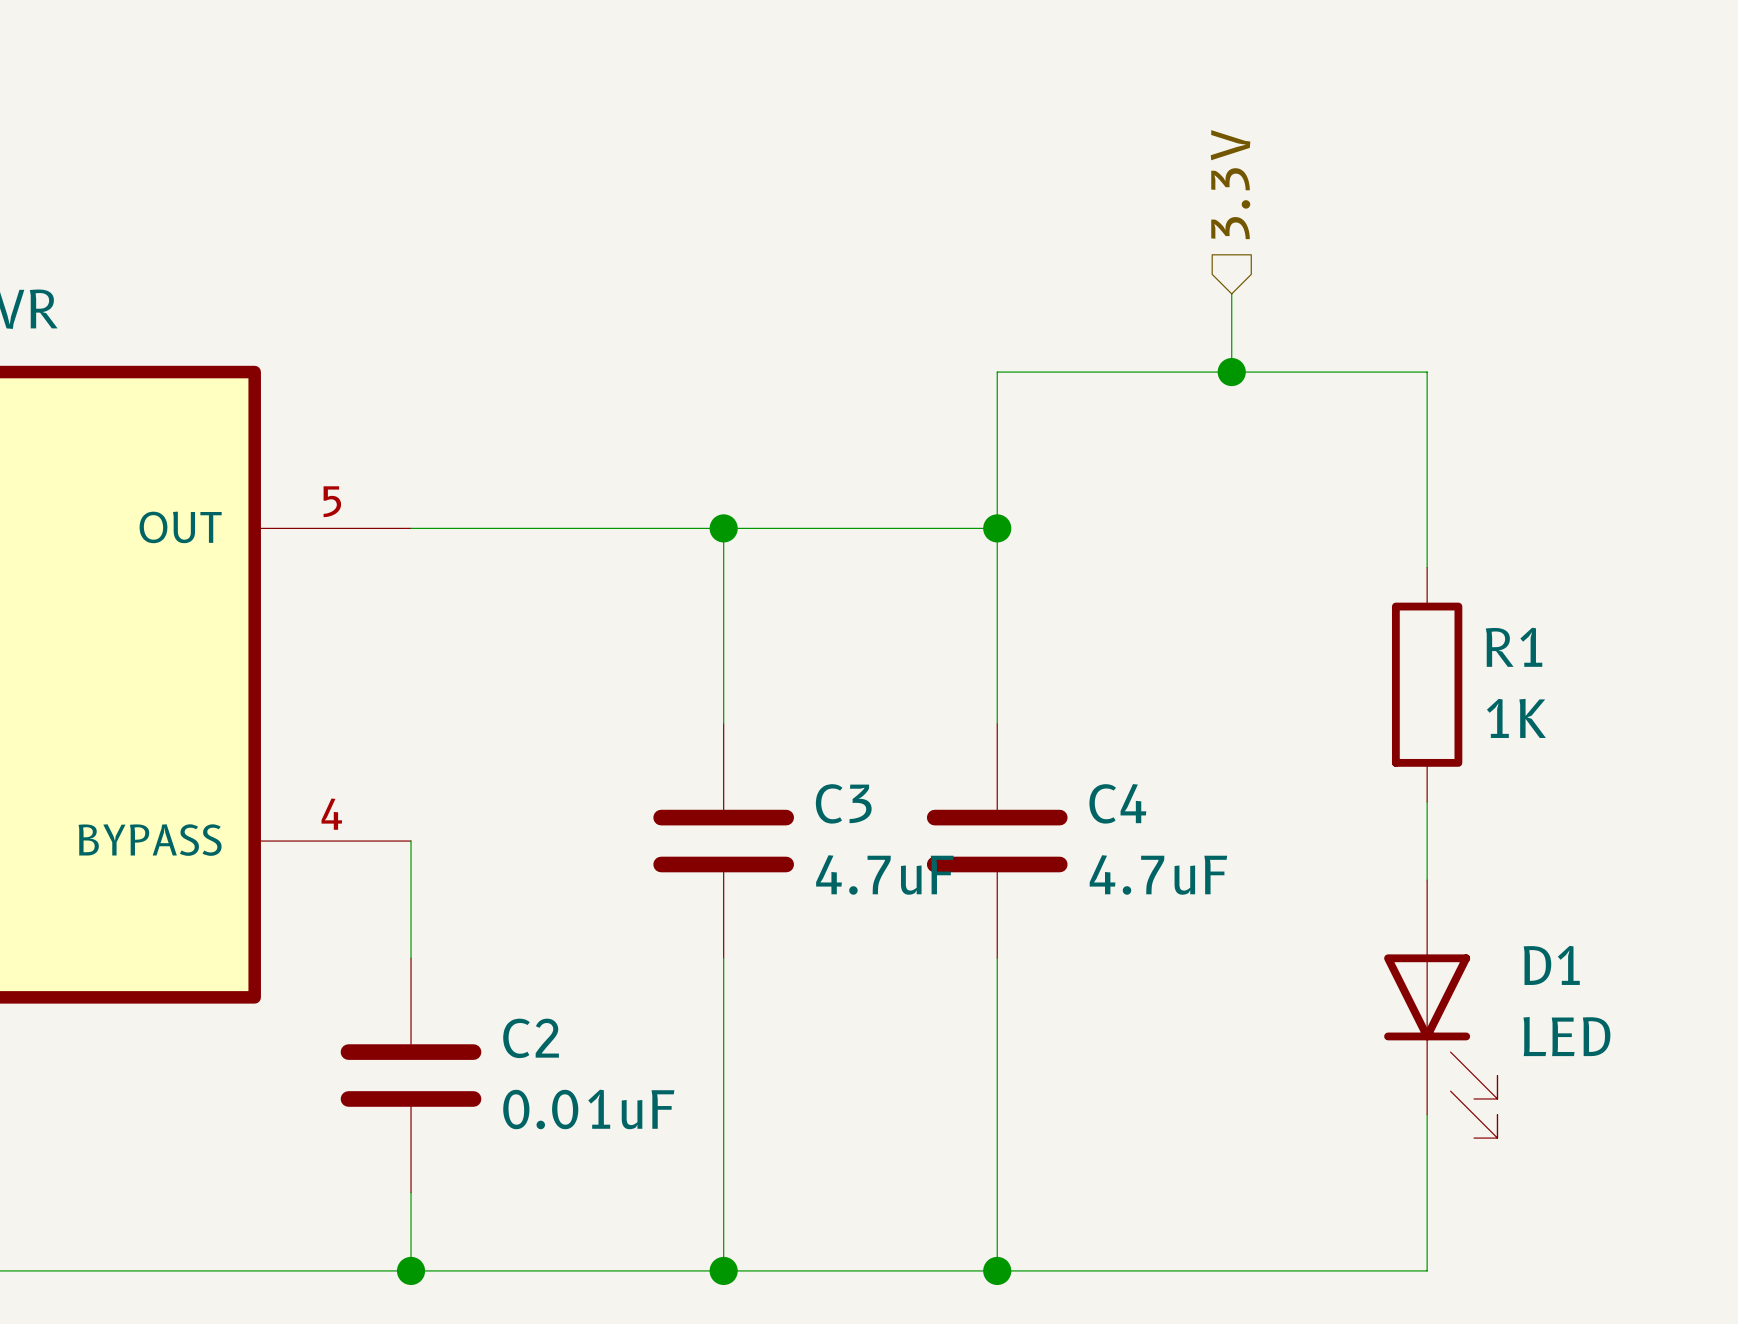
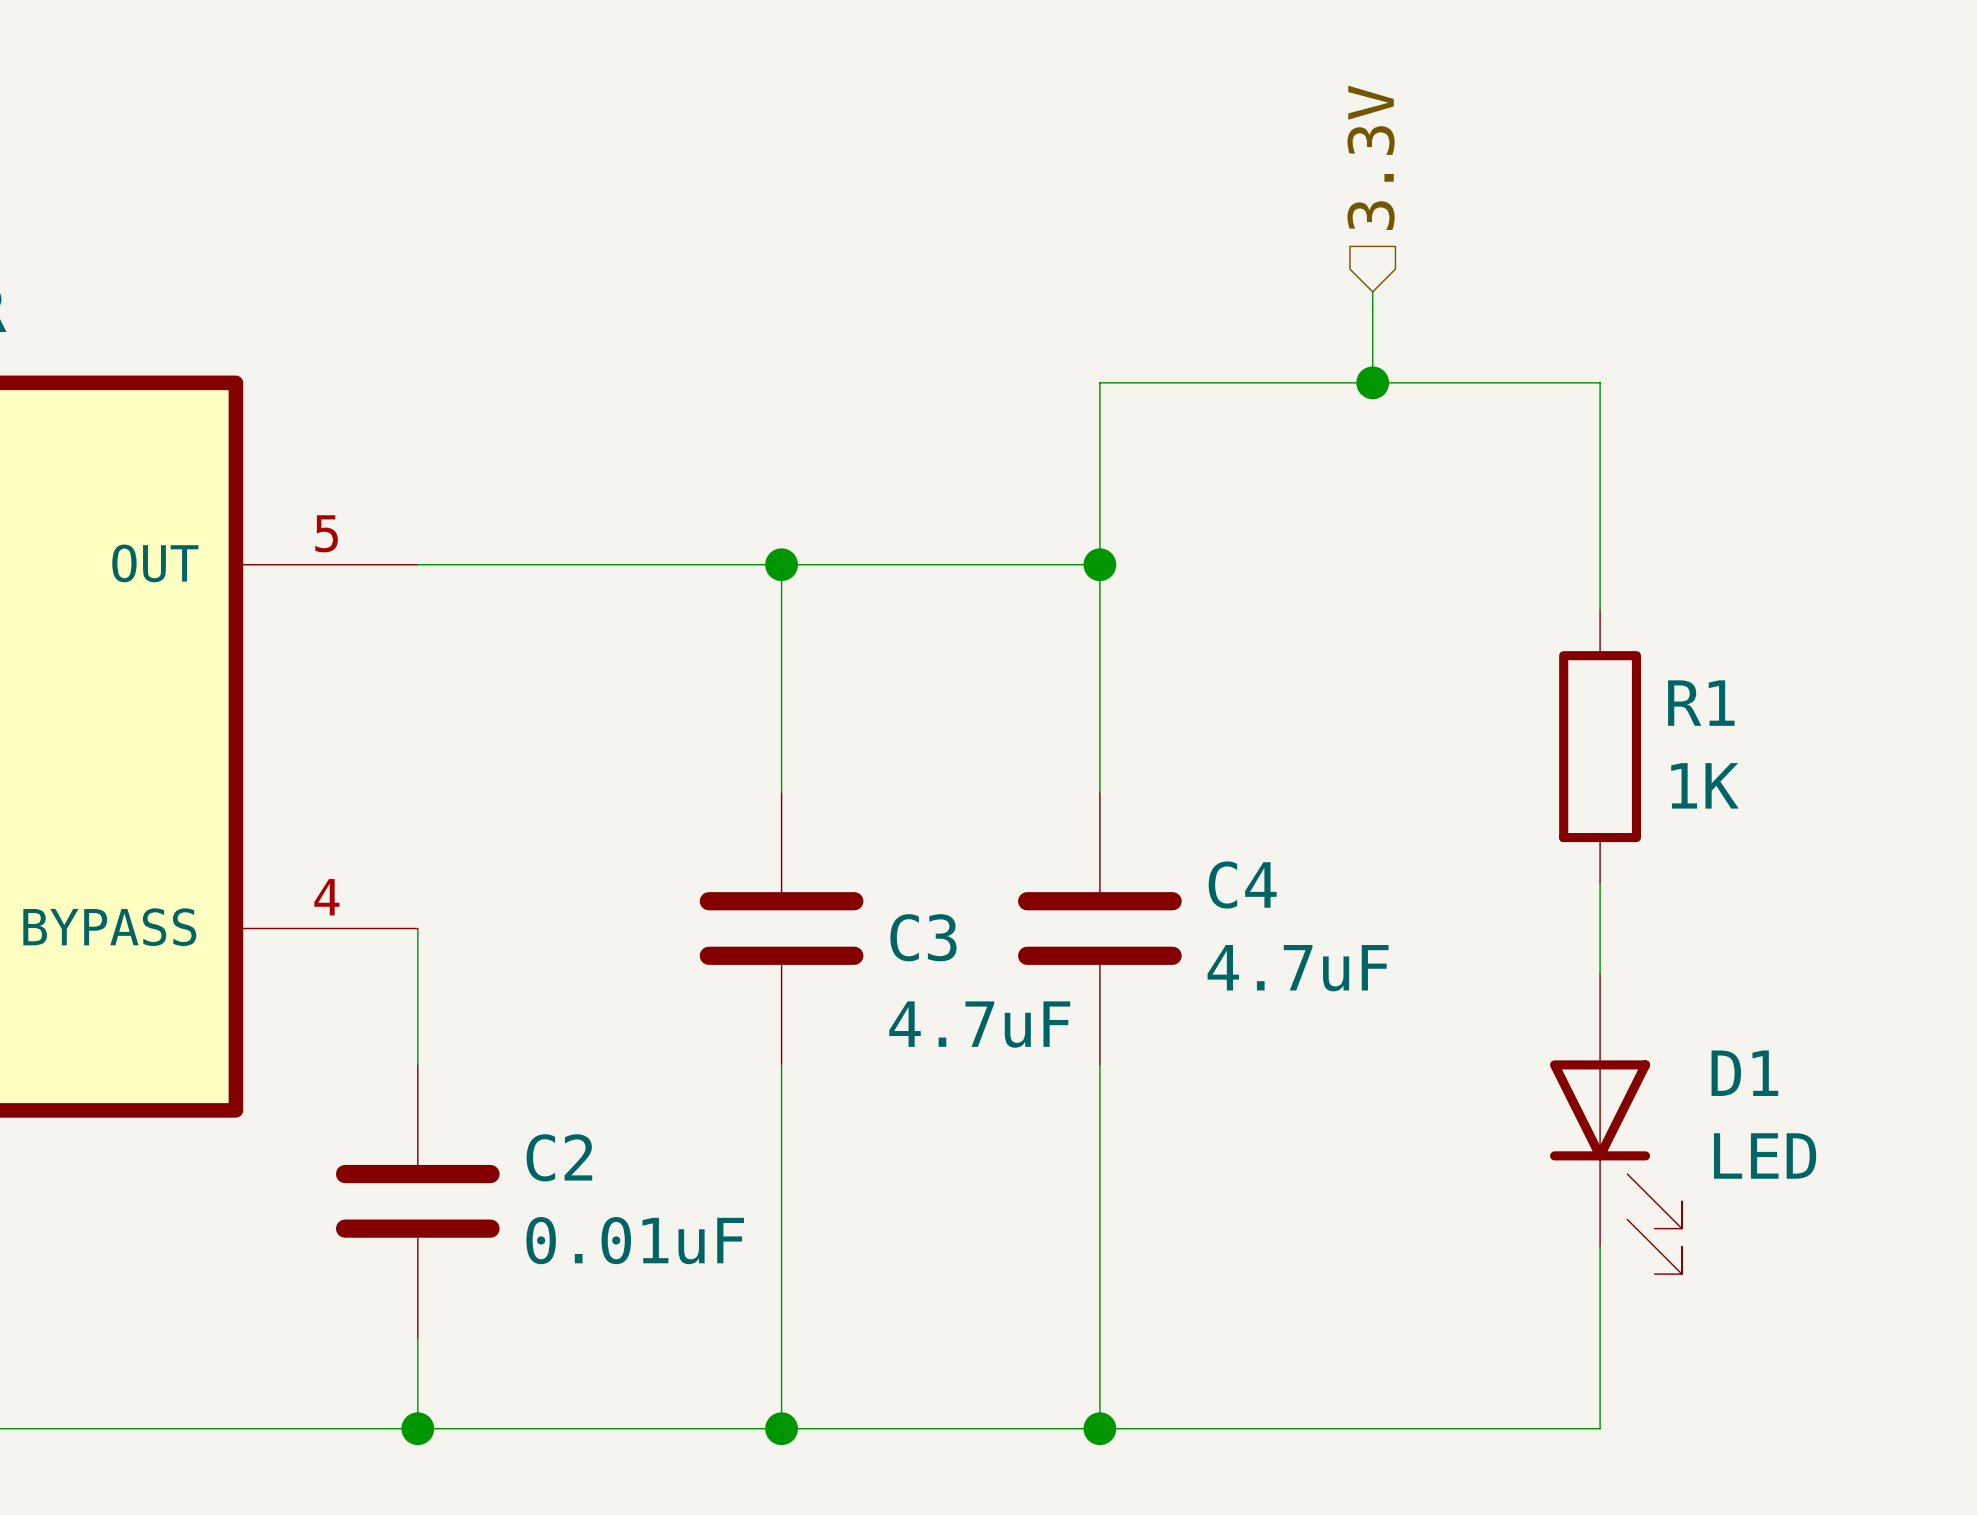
C3 name position: C3 (843, 803) -> C3 (923, 937)
C3 value position: 4.7uF (884, 874) -> 4.7uF (979, 1024)

